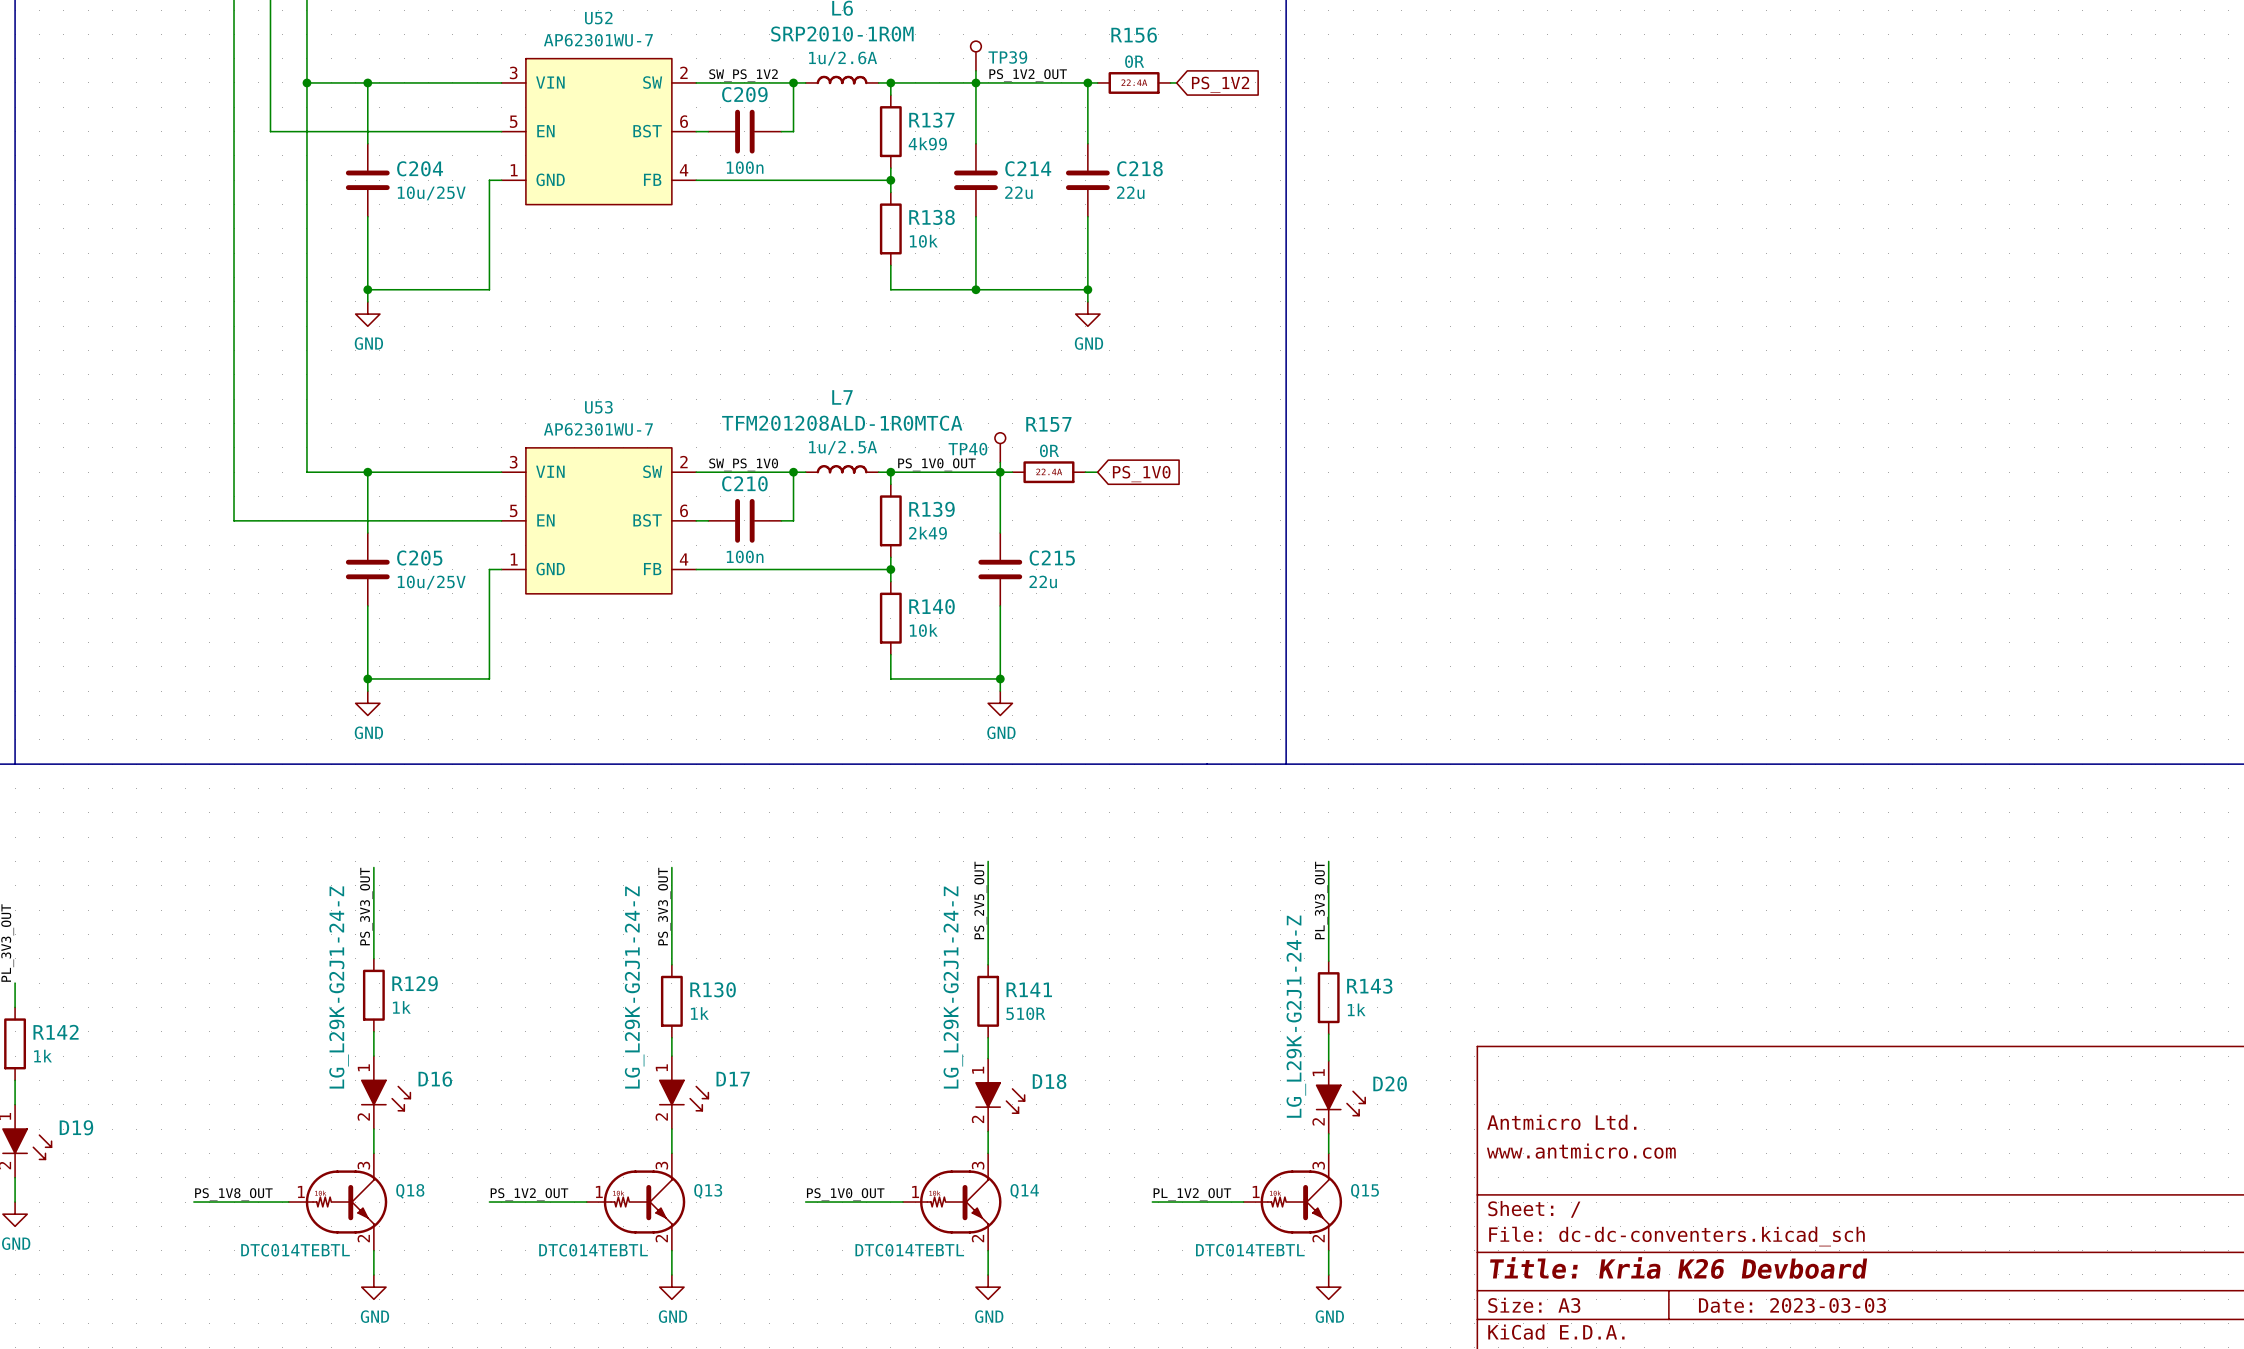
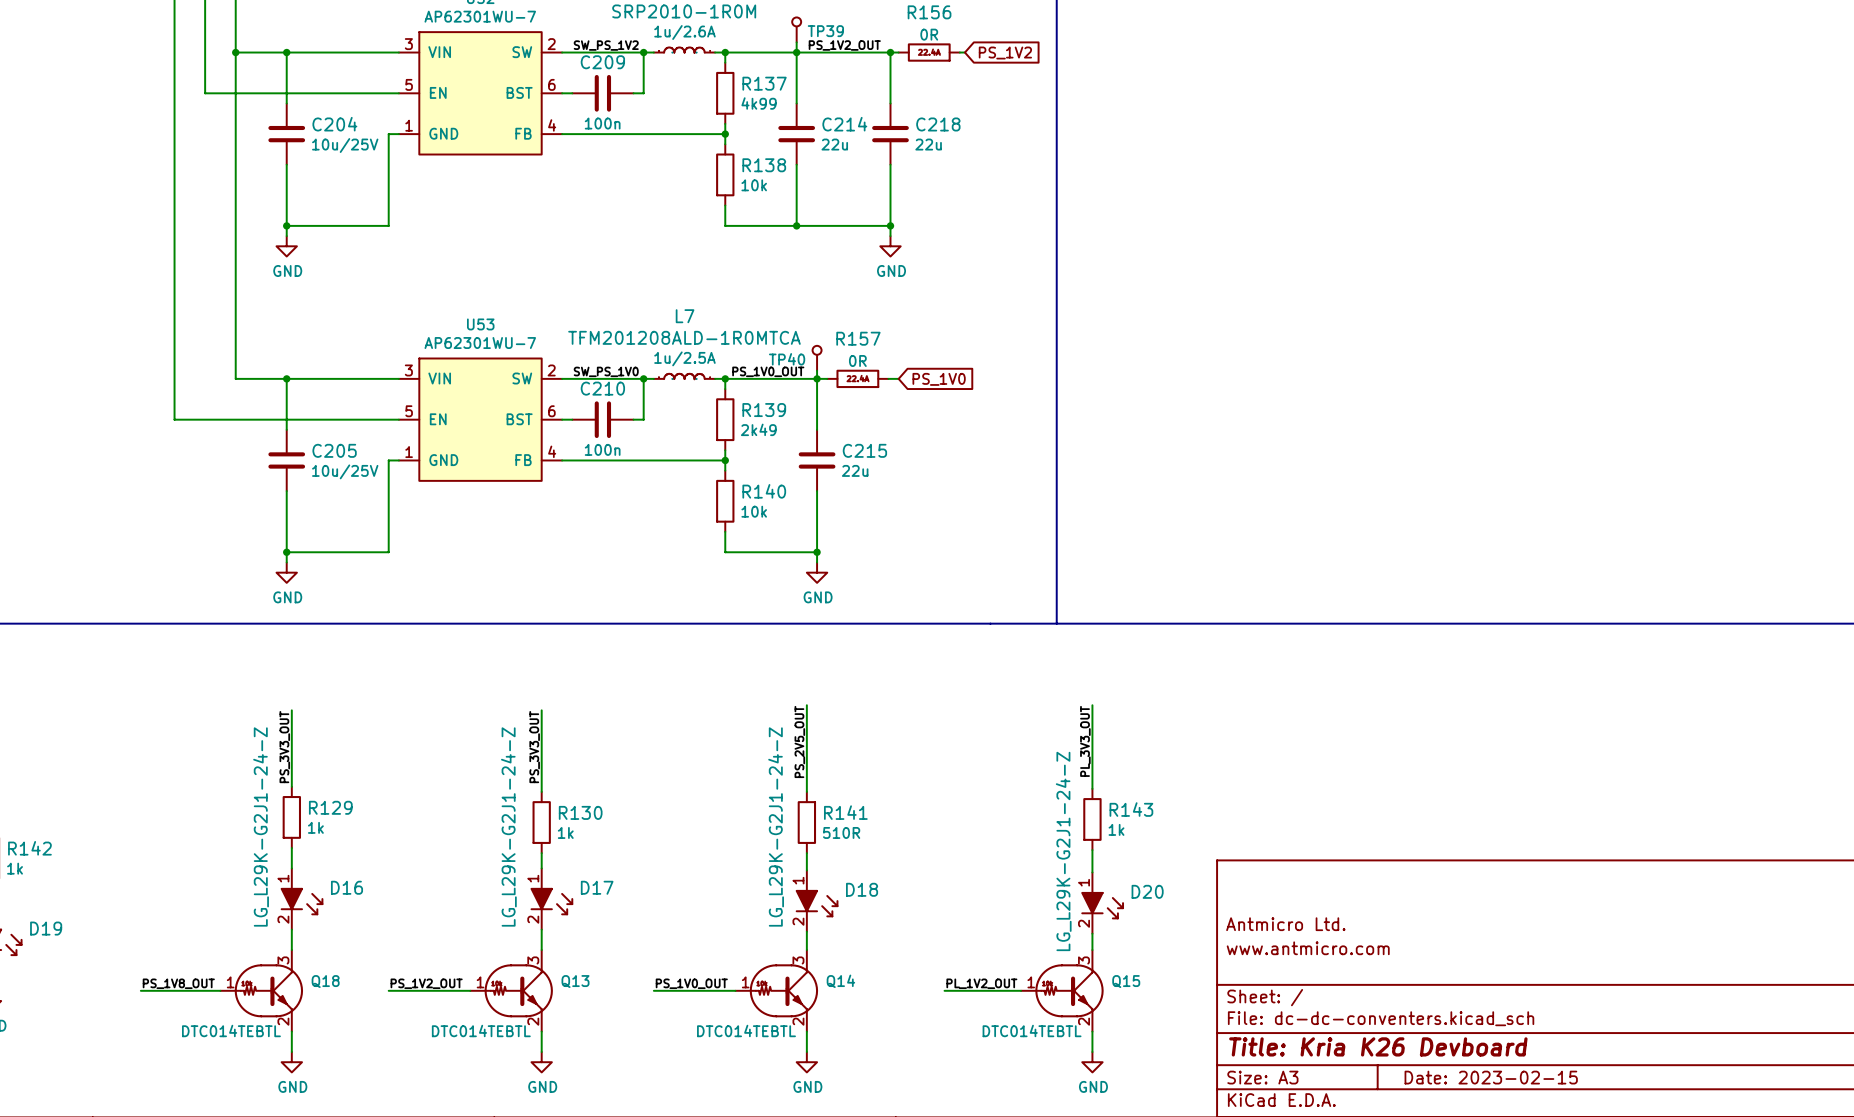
title block: Date: 2023-03-03 (1792, 1305) -> Date: 2023-02-15 (1491, 1077)

